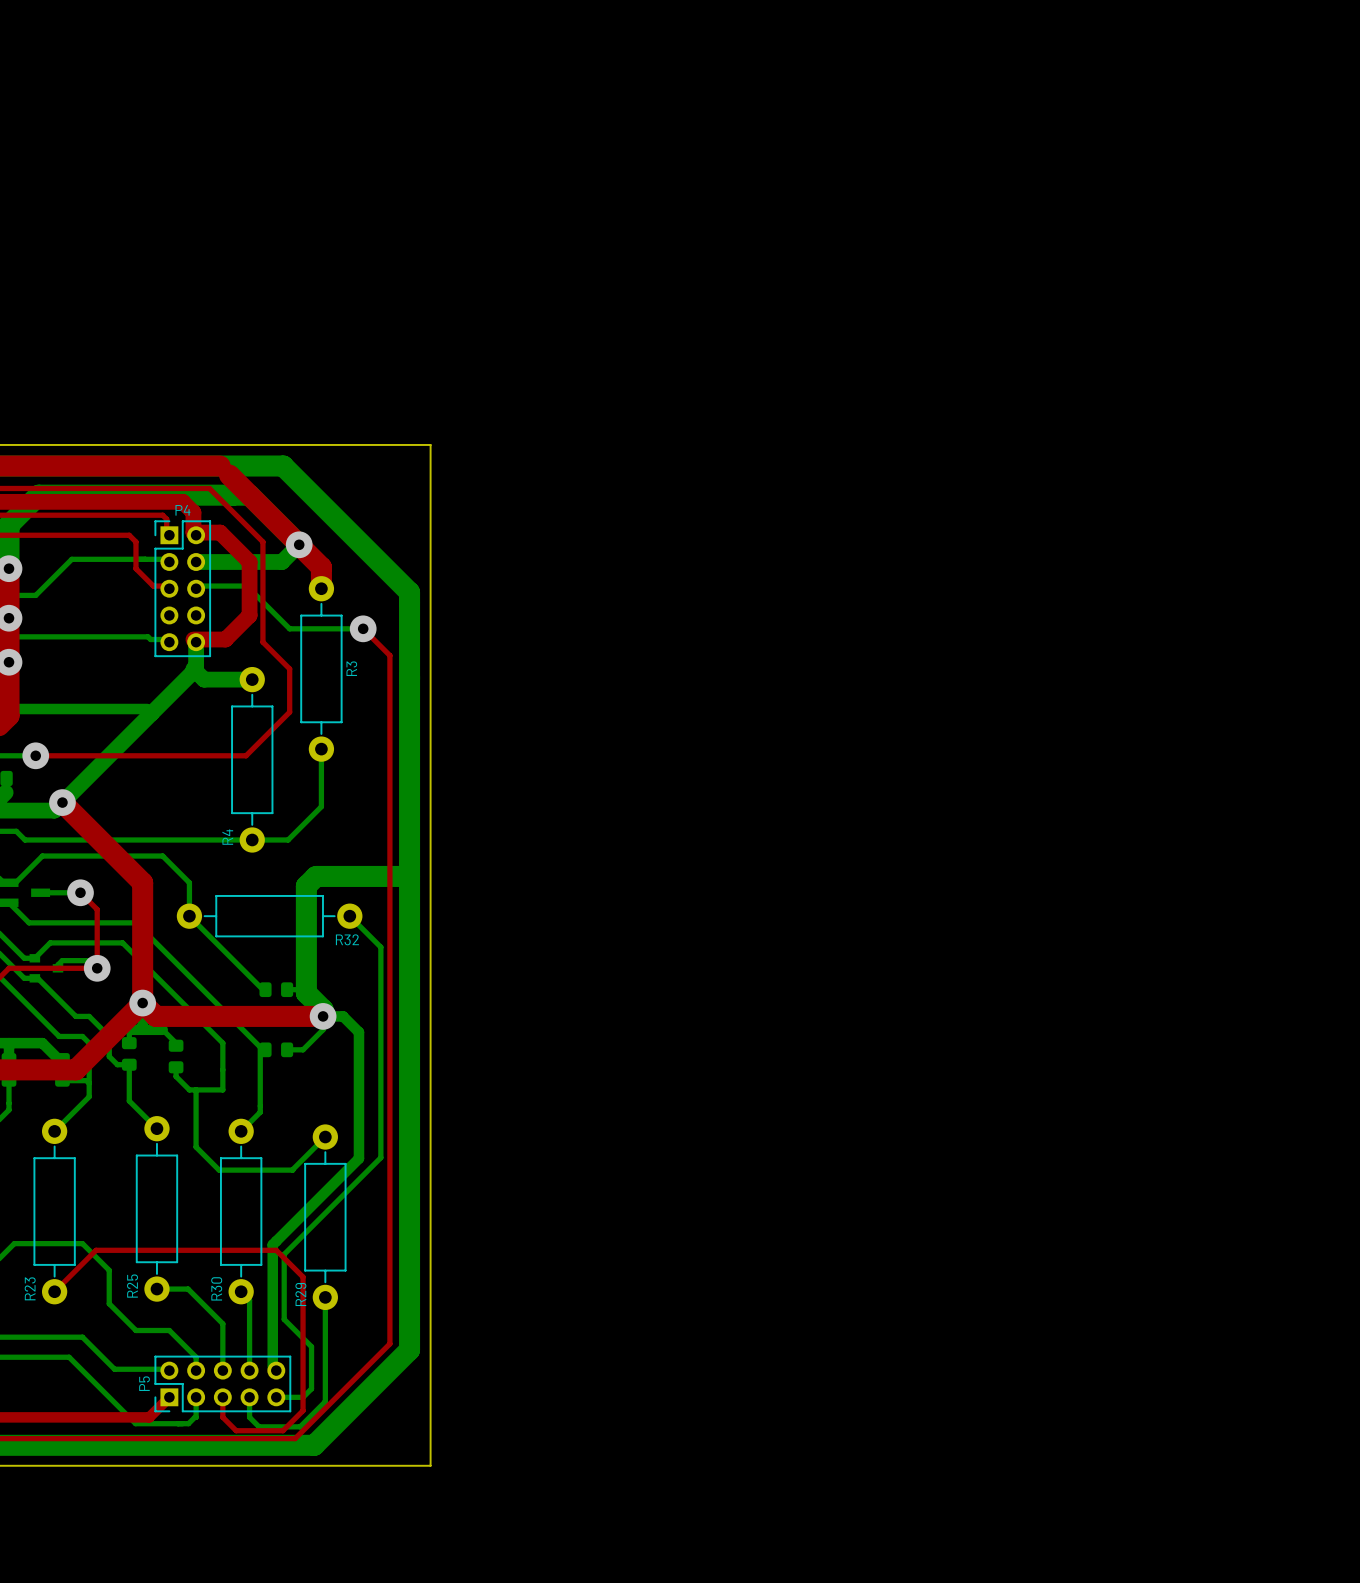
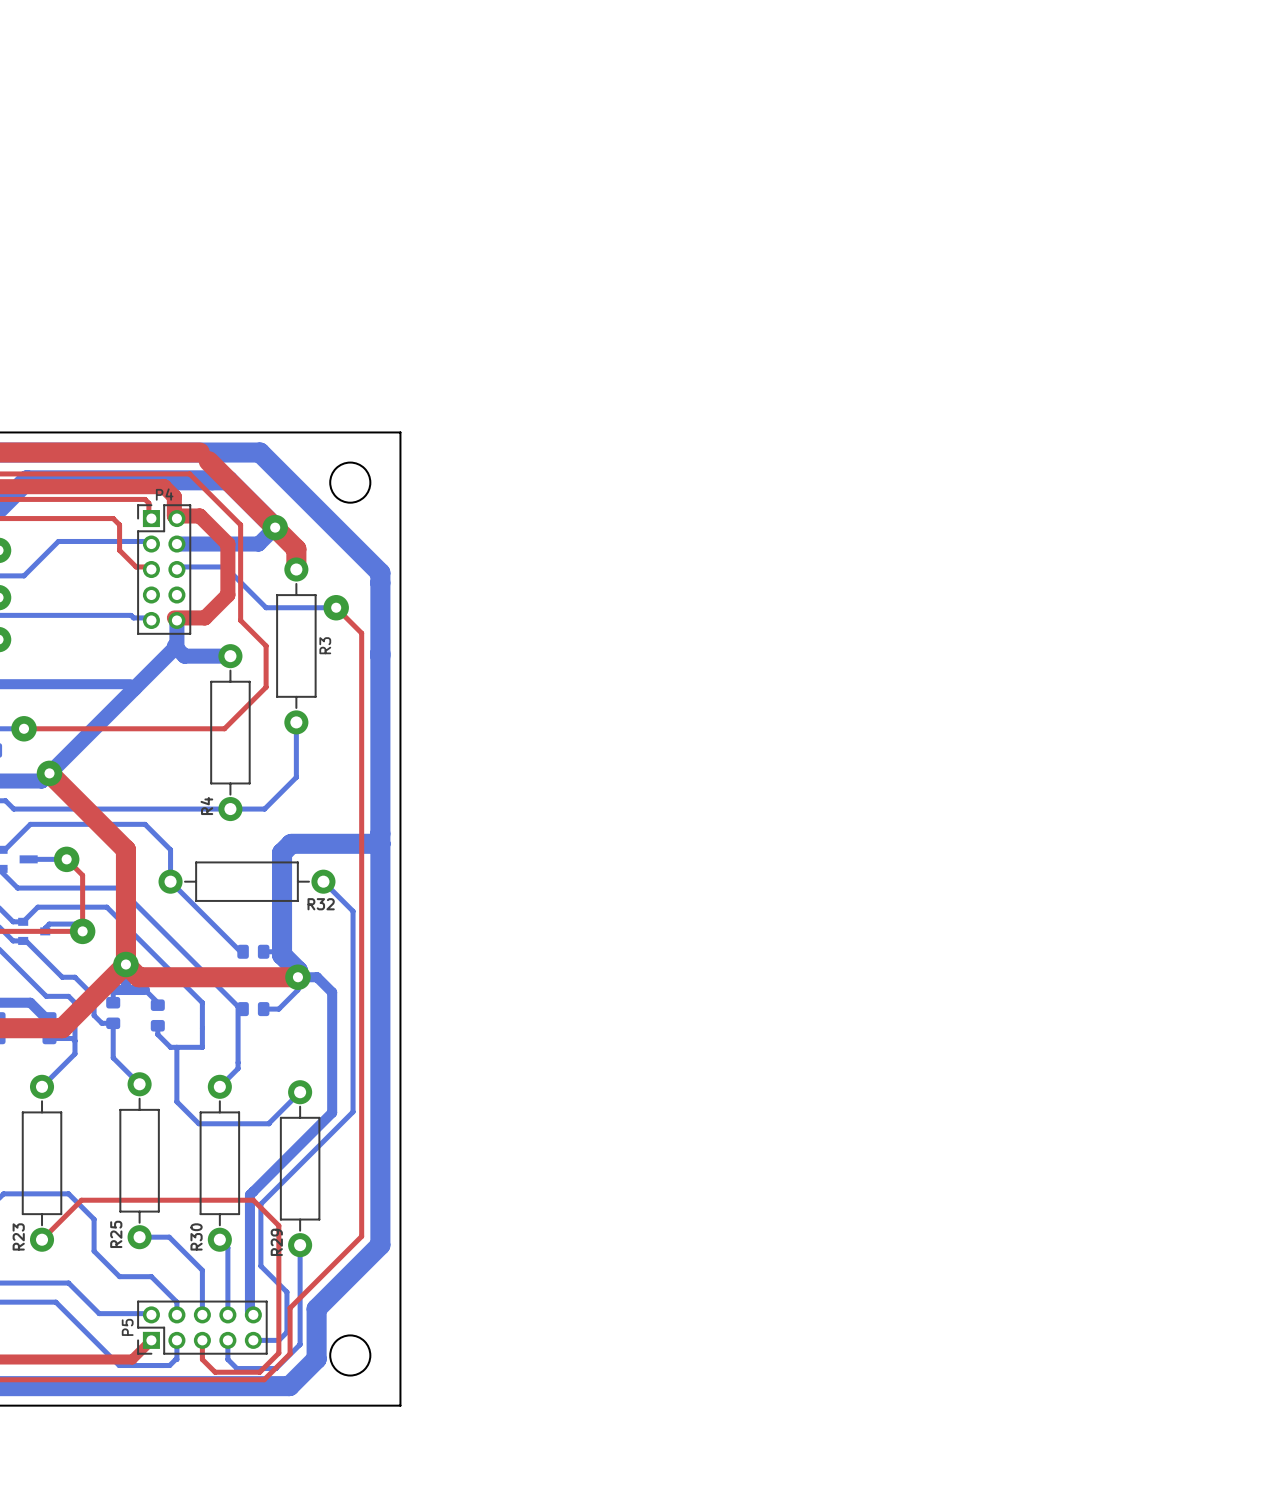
round board edge: none -> [329, 461, 372, 504]
top track: (389, 1288) (389, 1343) (295, 1438) (287, 1438) -> (361, 1236) (290, 1308) (290, 1353) (264, 1379)
bottom track: (409, 1297) (409, 1350) (342, 1416) -> (380, 1245) (316, 1308) (316, 1359)
round board edge: none -> [329, 1334, 372, 1377]

